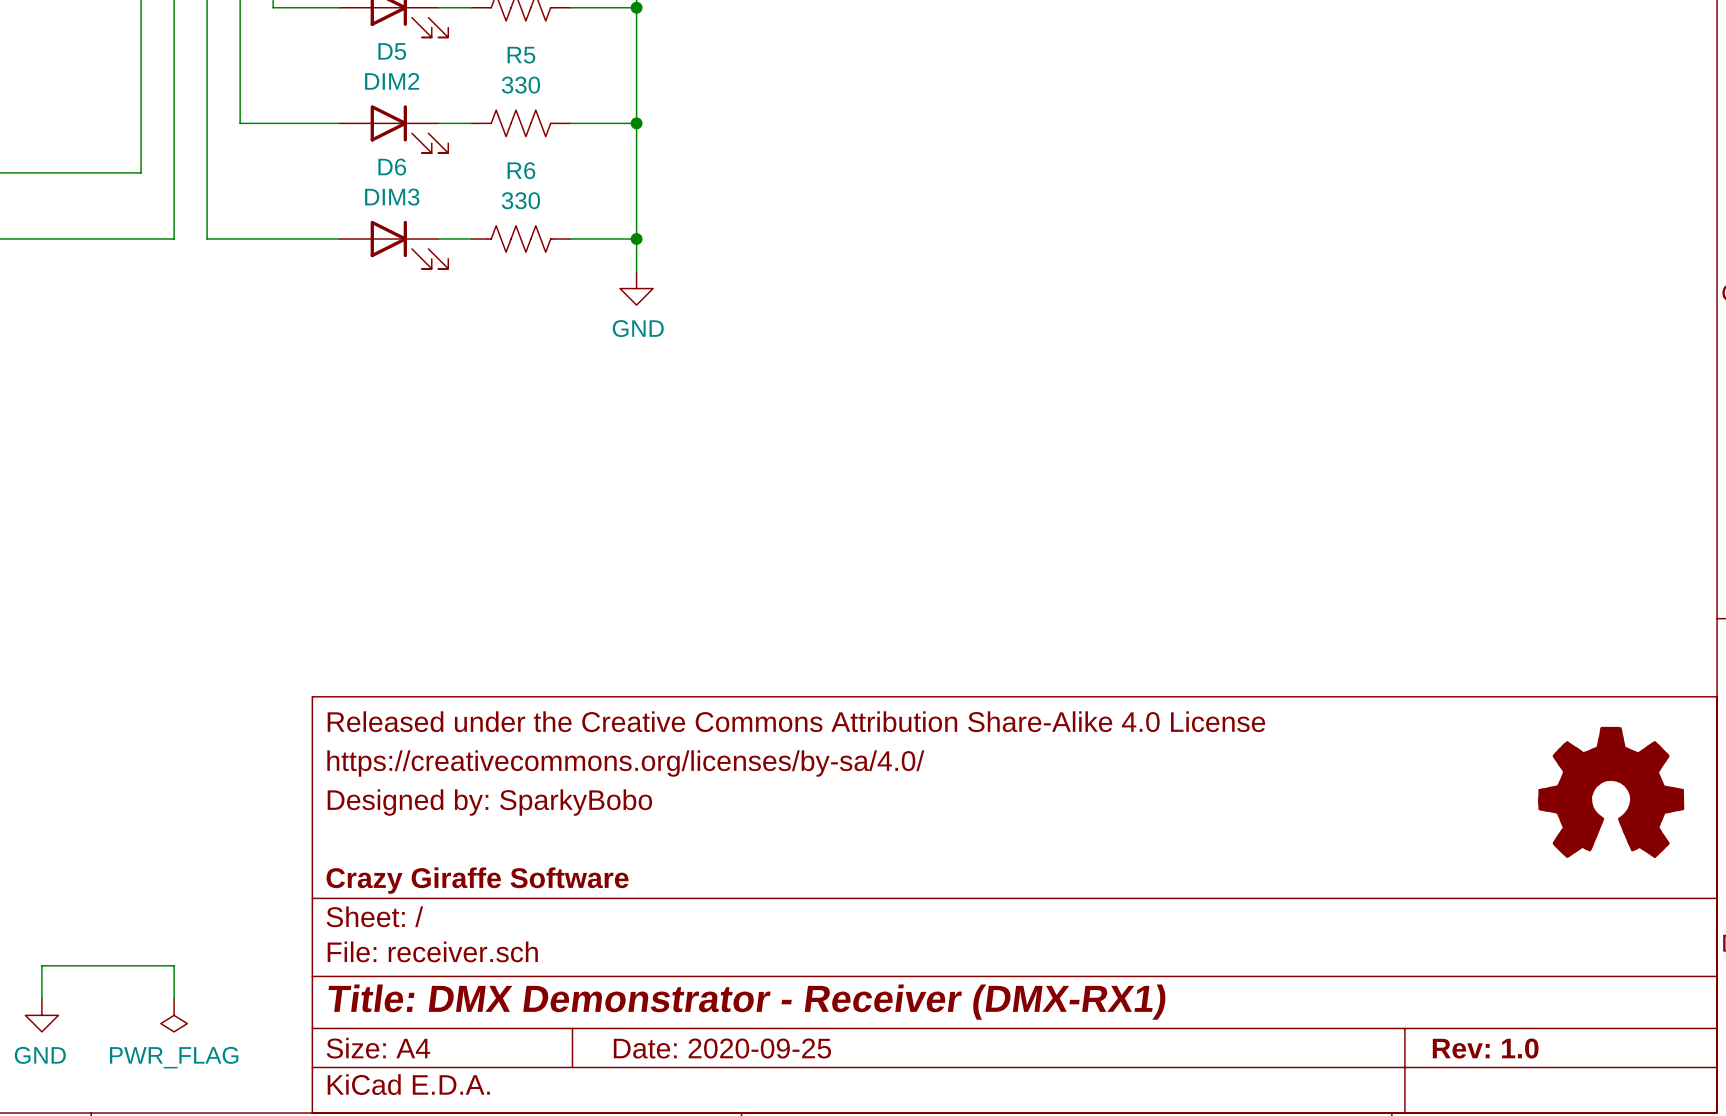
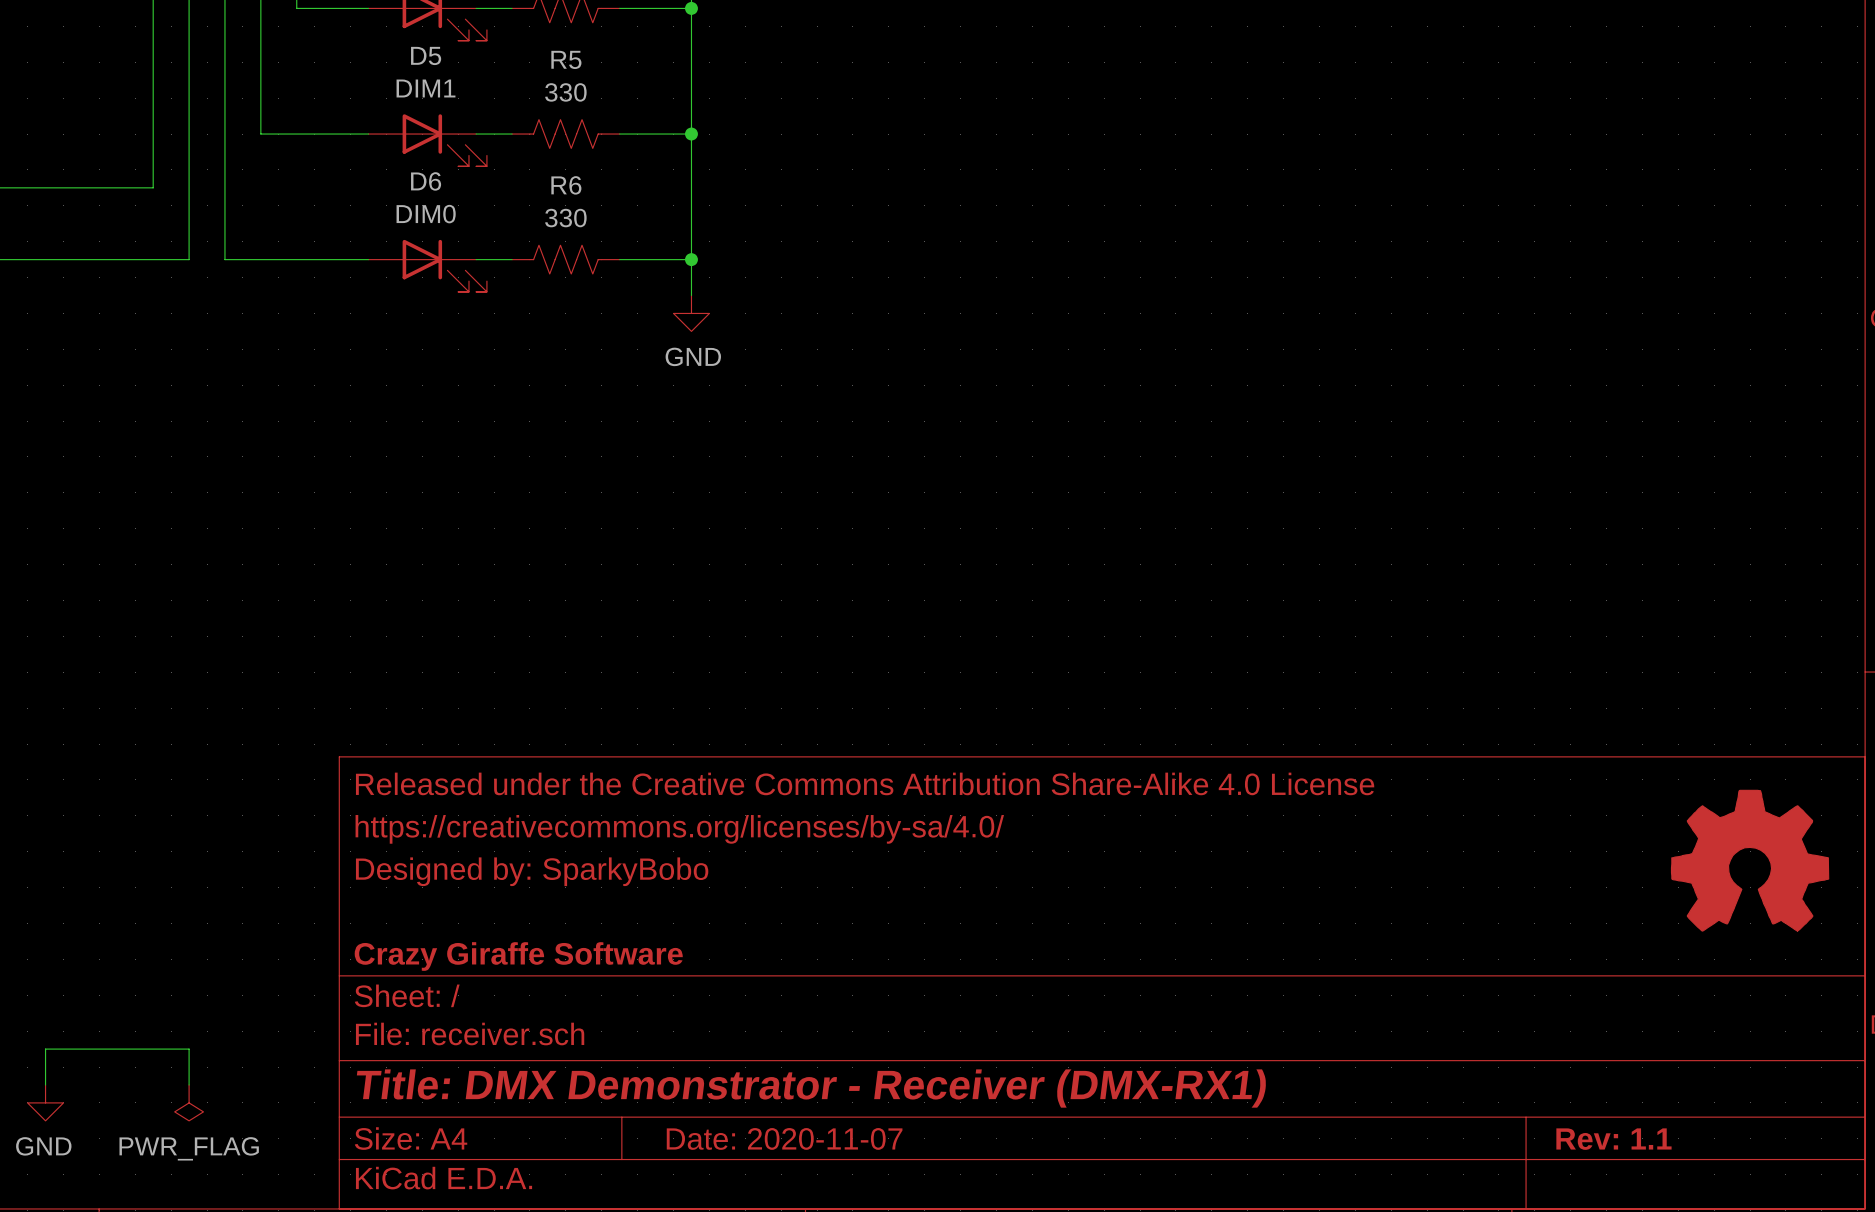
D5 value: DIM2 (392, 81) -> DIM1 (426, 88)
D6 value: DIM3 (392, 197) -> DIM0 (426, 214)
title block: Date: 2020-09-25 (722, 1048) -> Date: 2020-11-07 (784, 1138)
title block: Rev: 1.0 (1485, 1048) -> Rev: 1.1 (1613, 1139)

